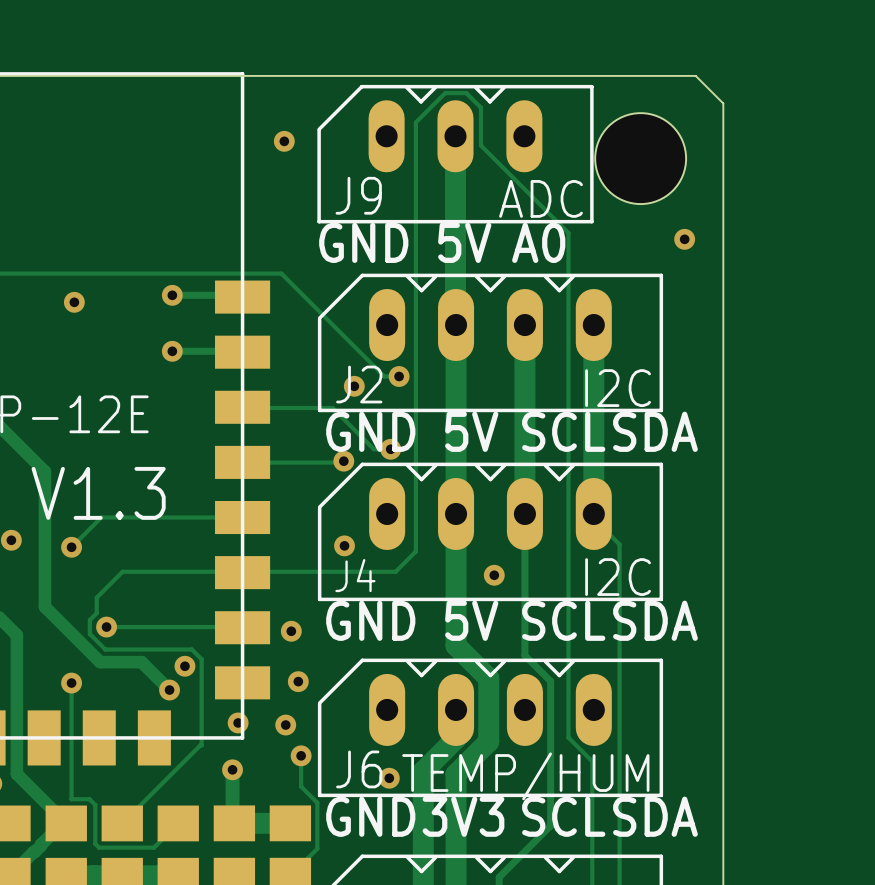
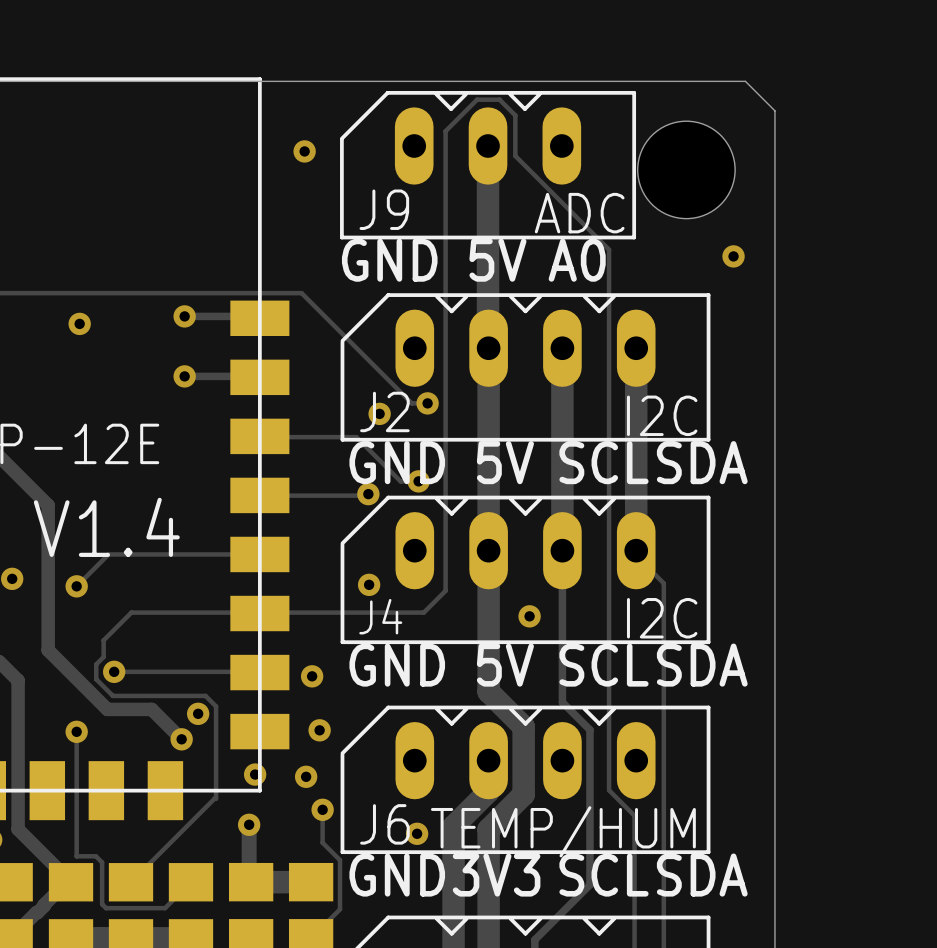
text: V1.3 (98, 493) -> V1.4 (106, 527)

